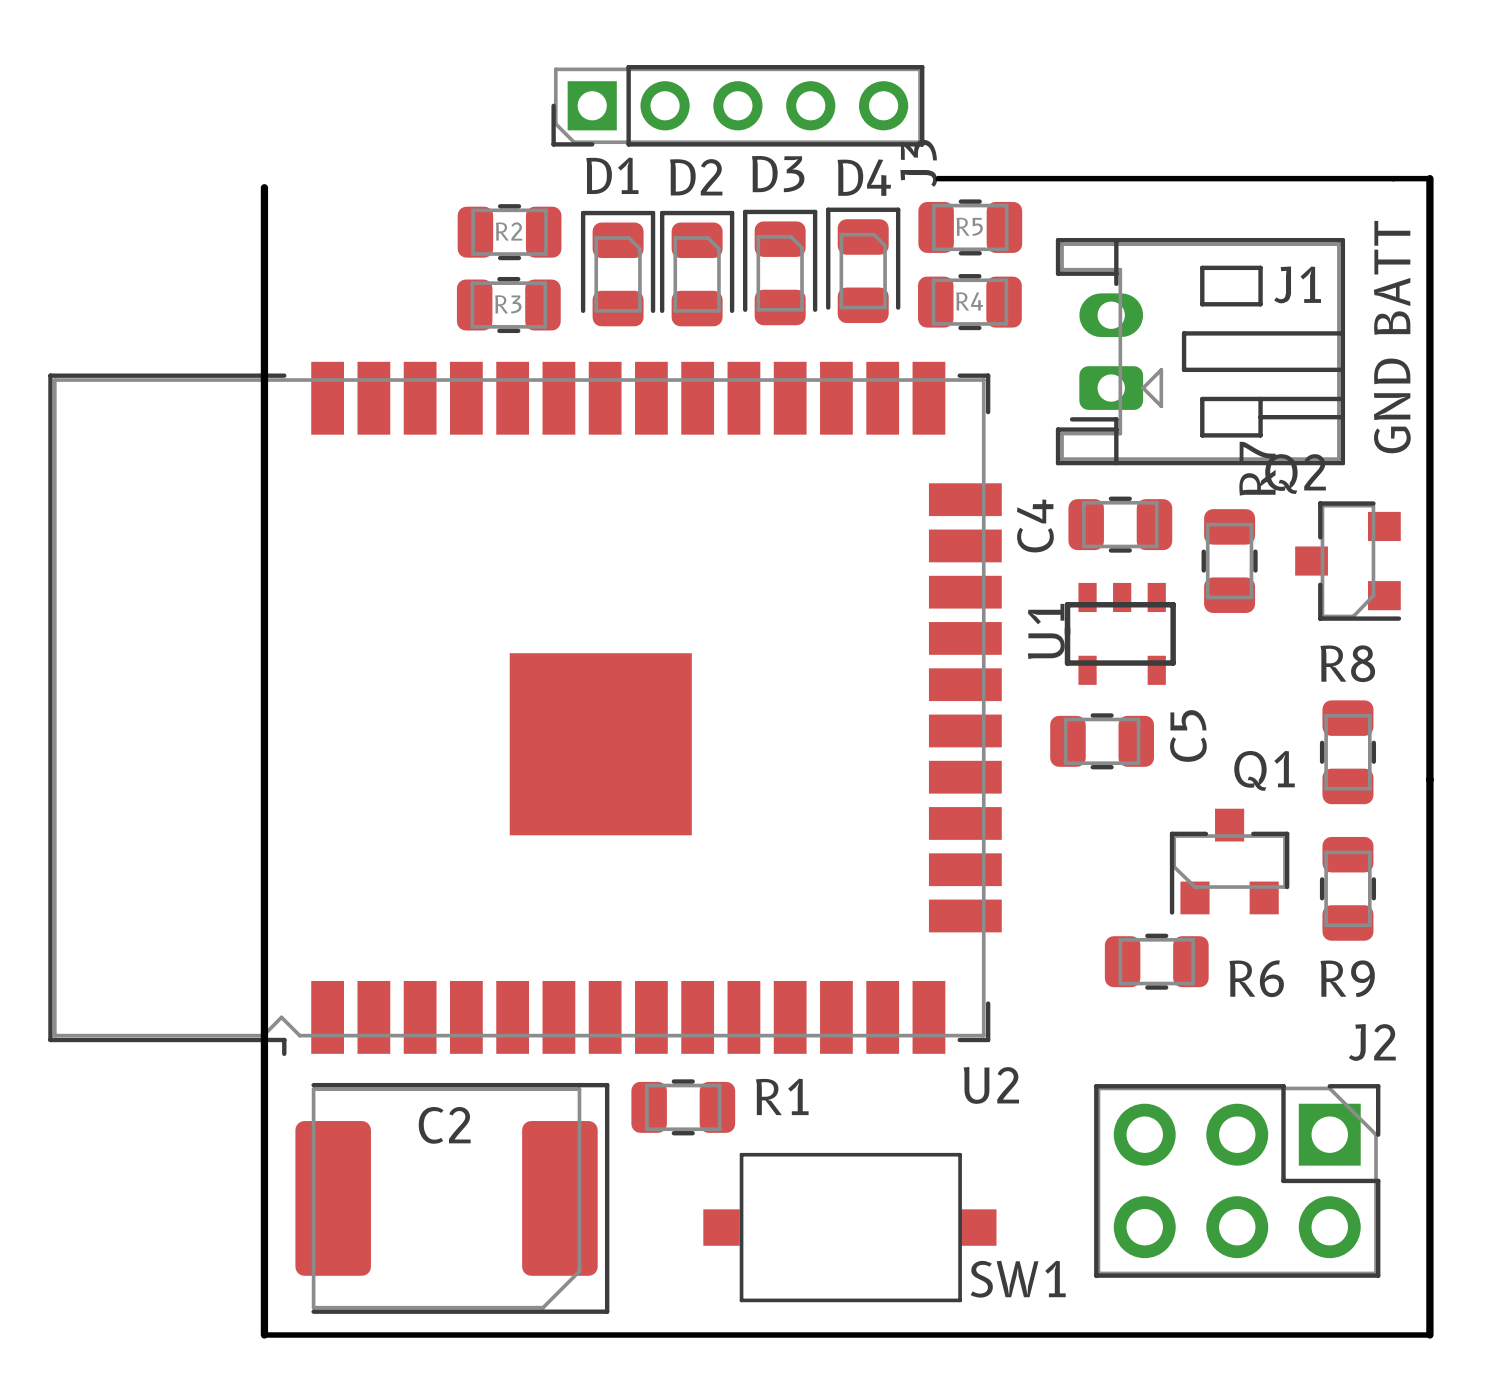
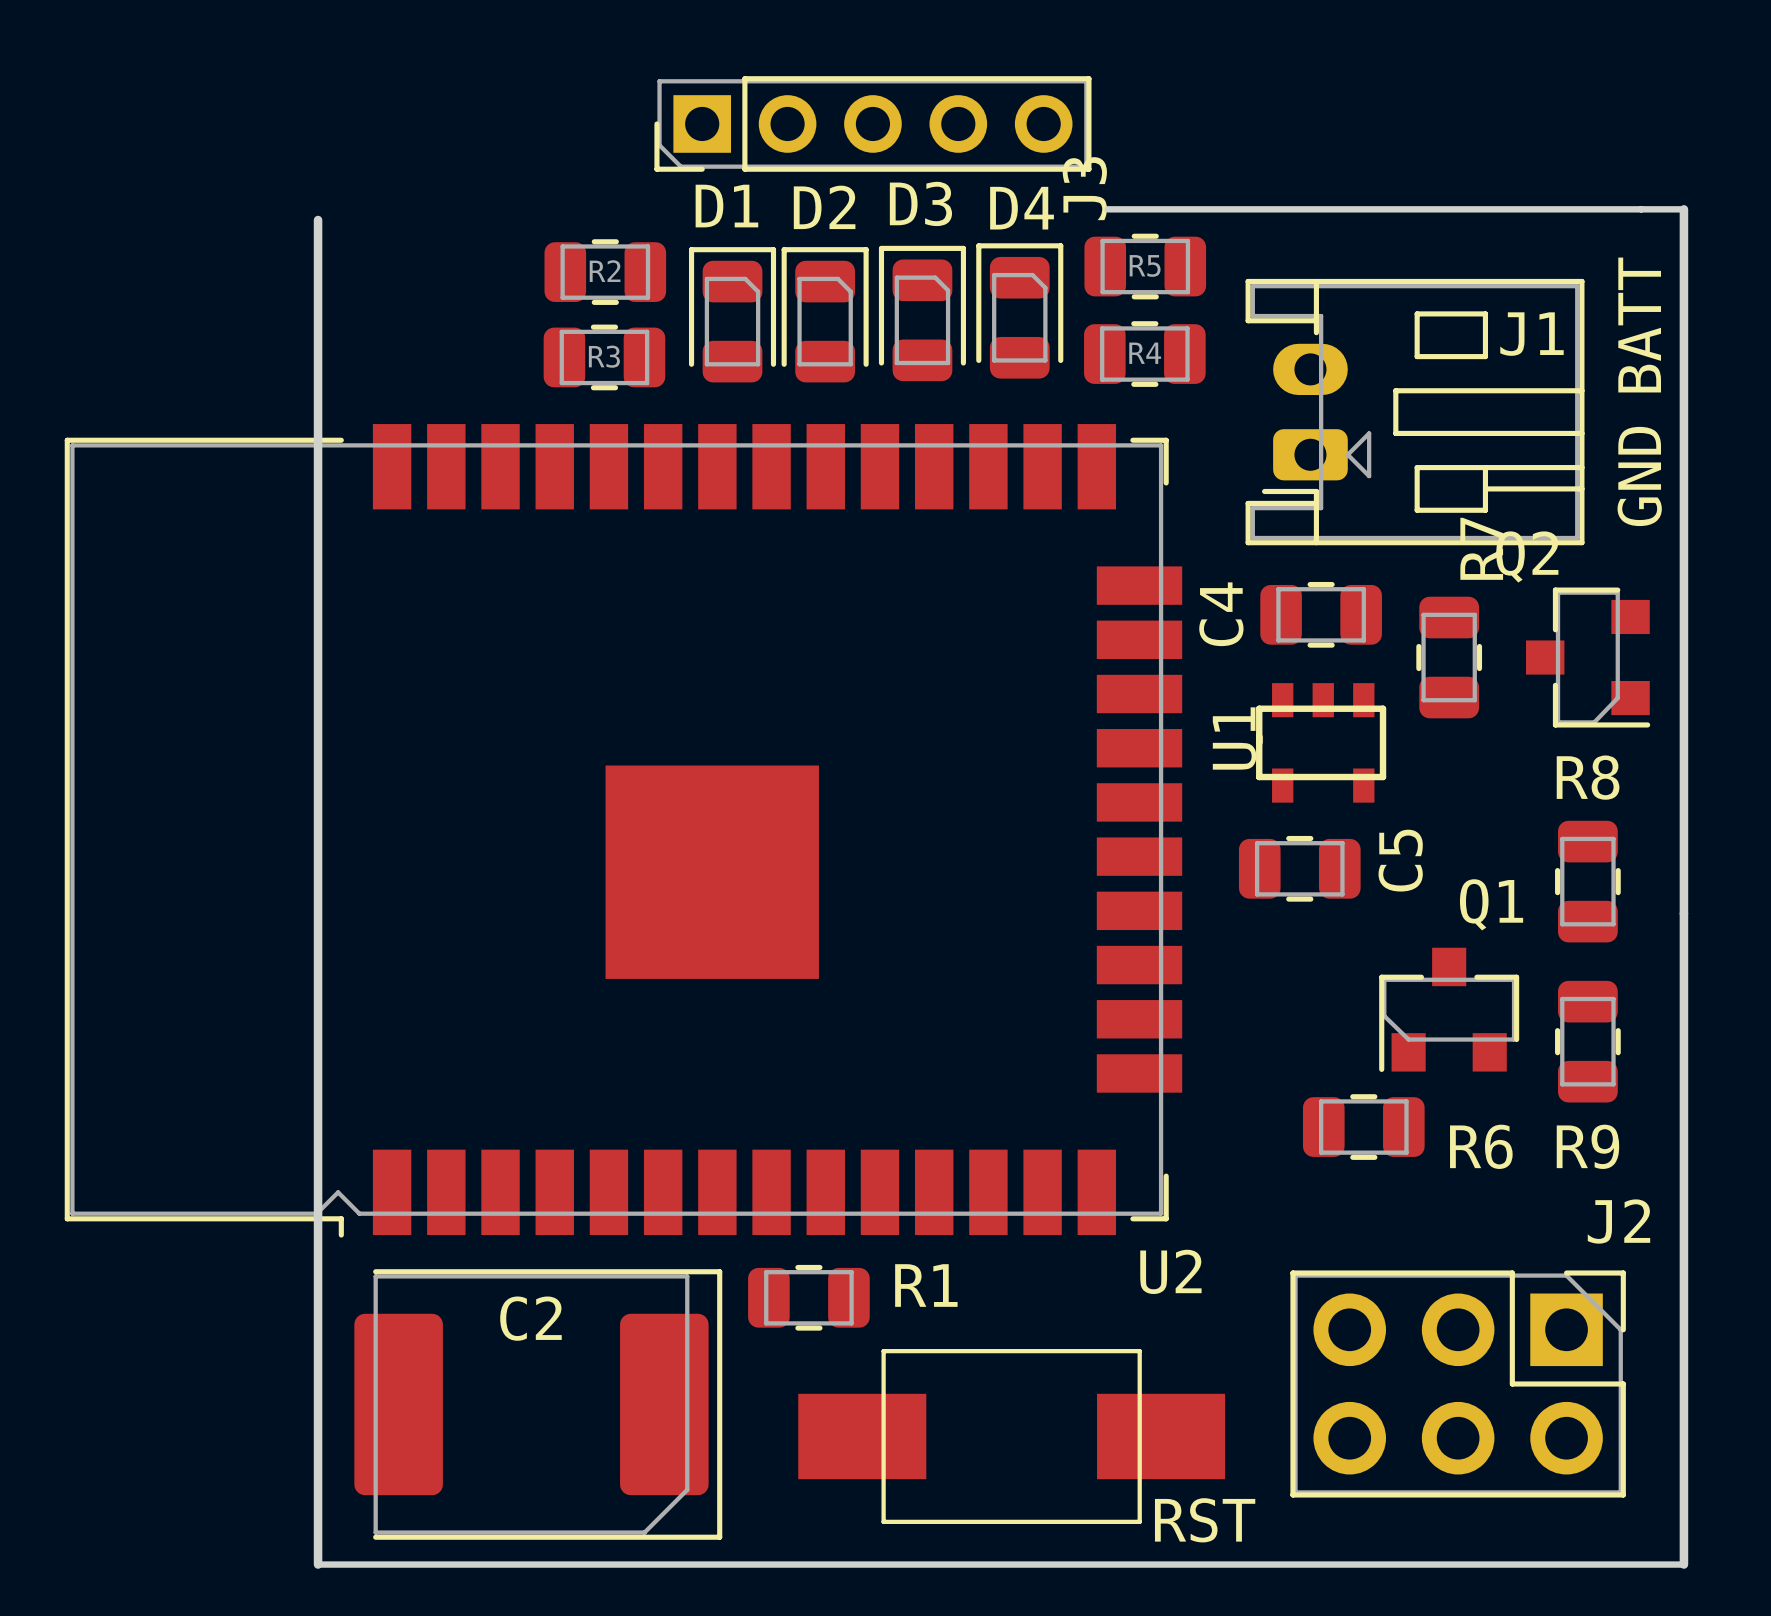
RST: none -> (1011, 1436)
SW1: (849, 1227) -> none

